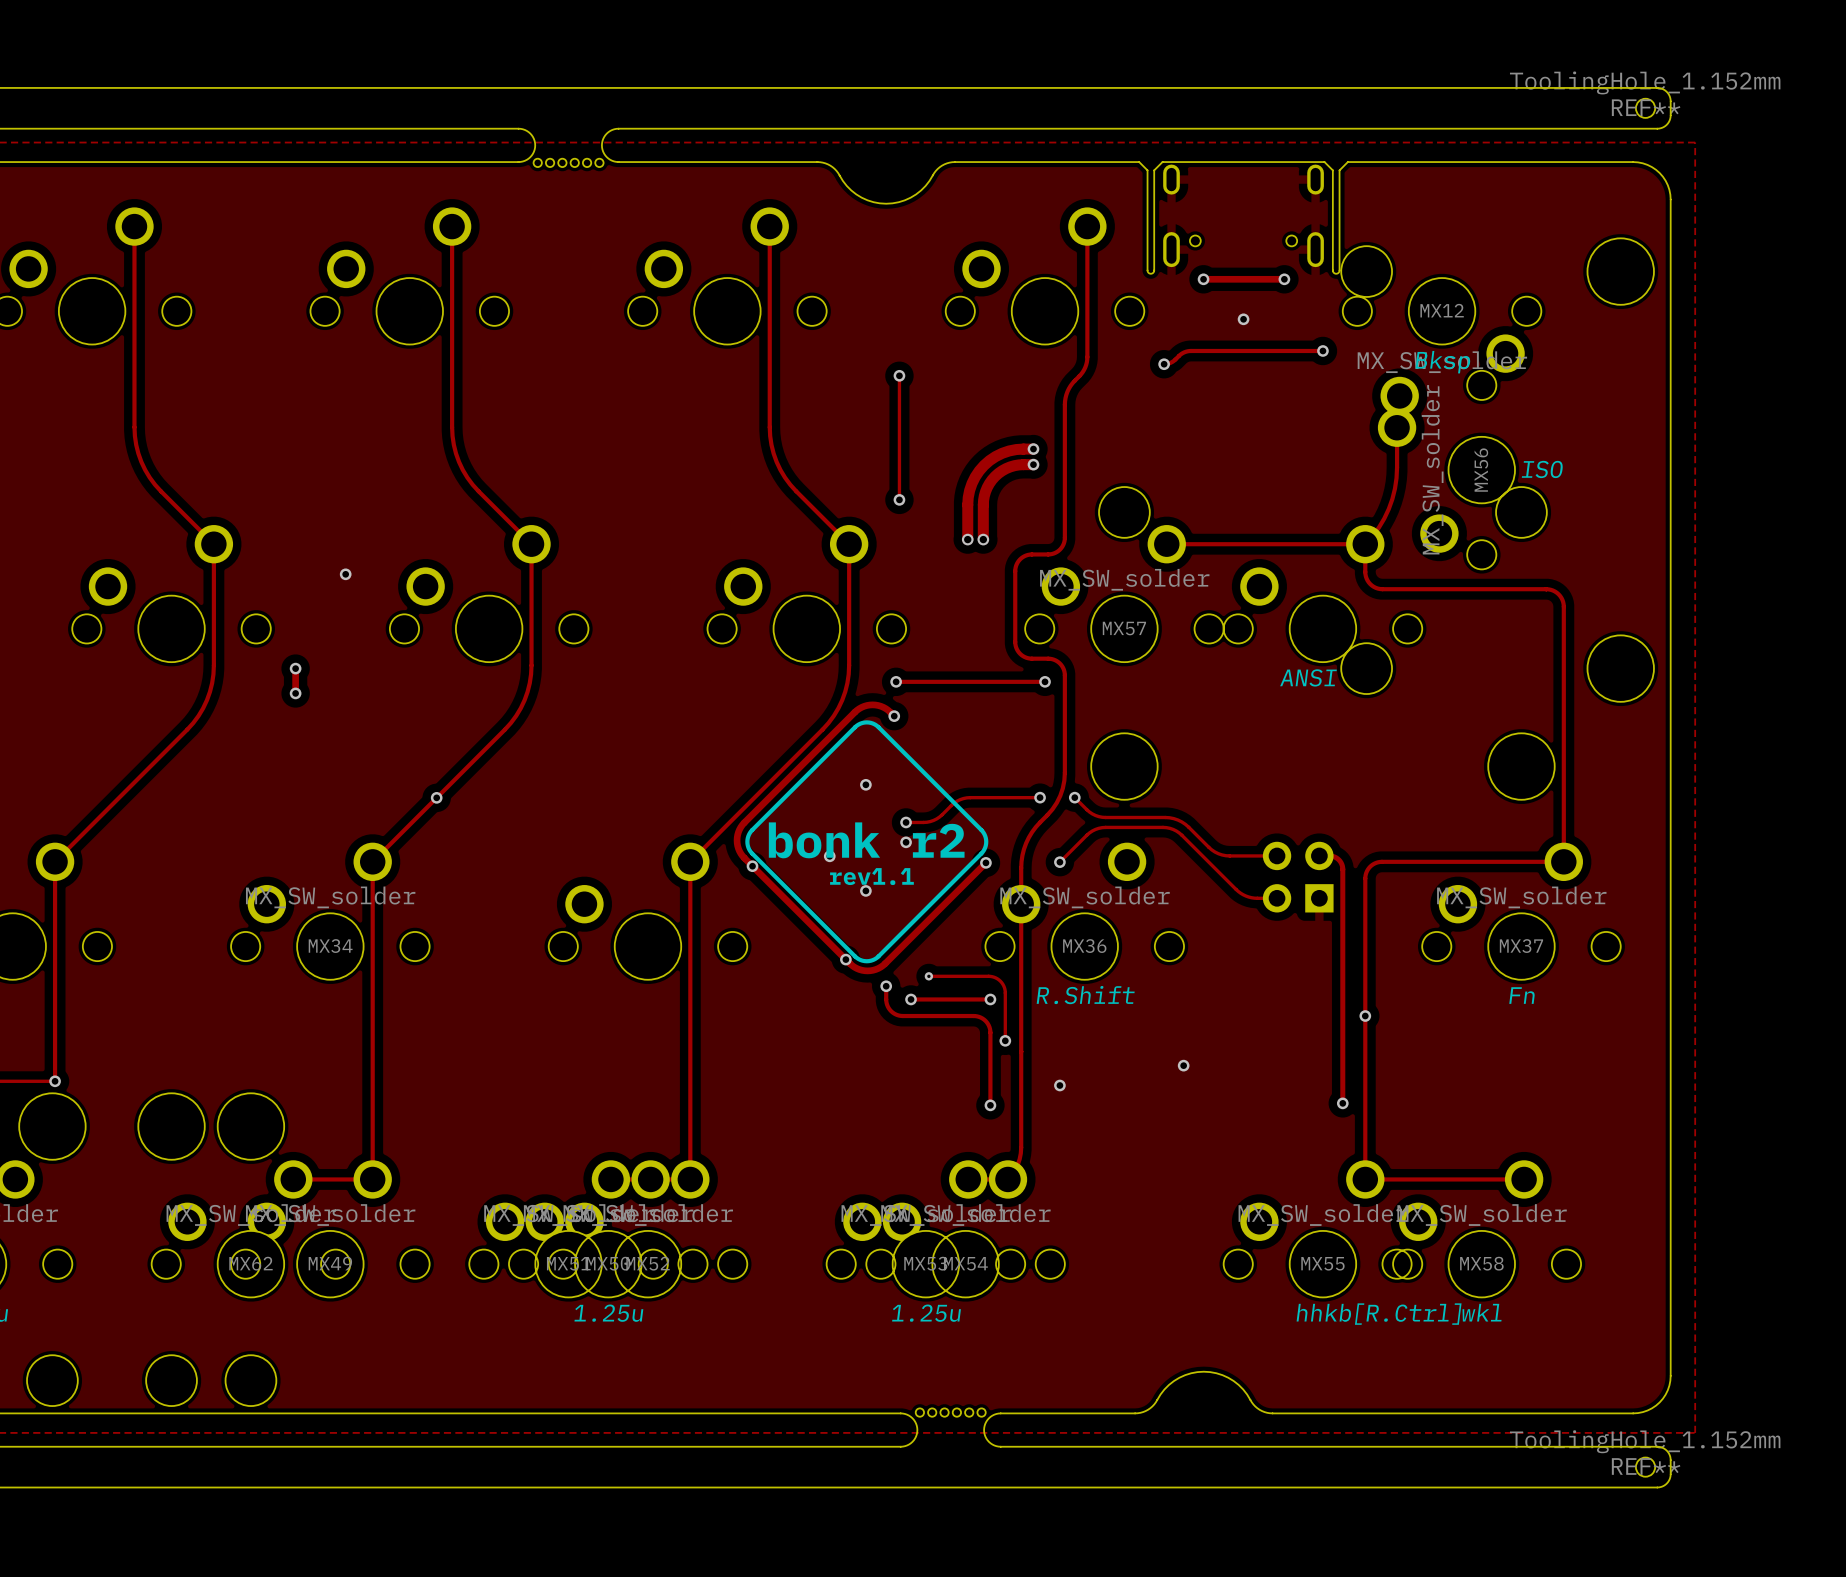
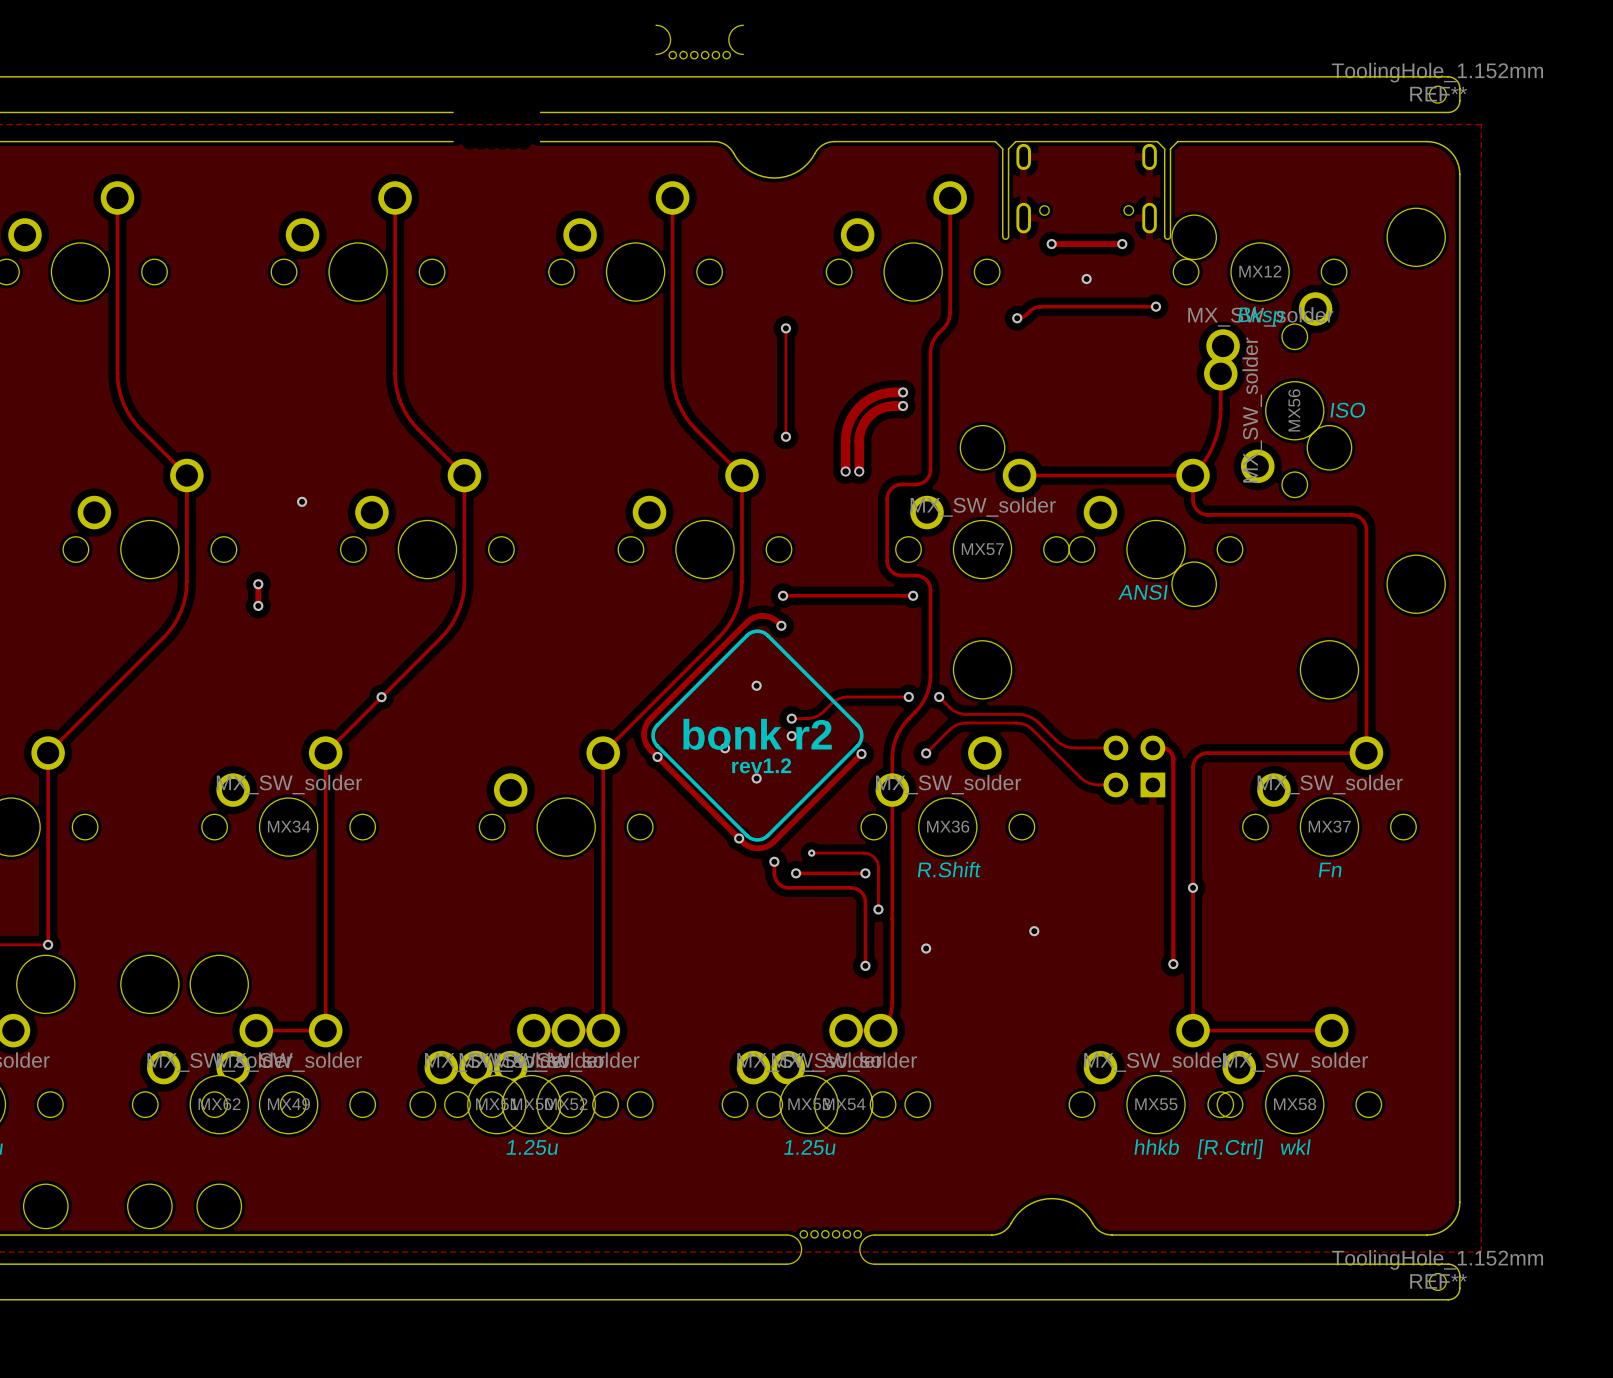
part position: (568, 147) -> (699, 41)
text: rev1.1 (871, 876) -> rev1.2 (761, 765)

